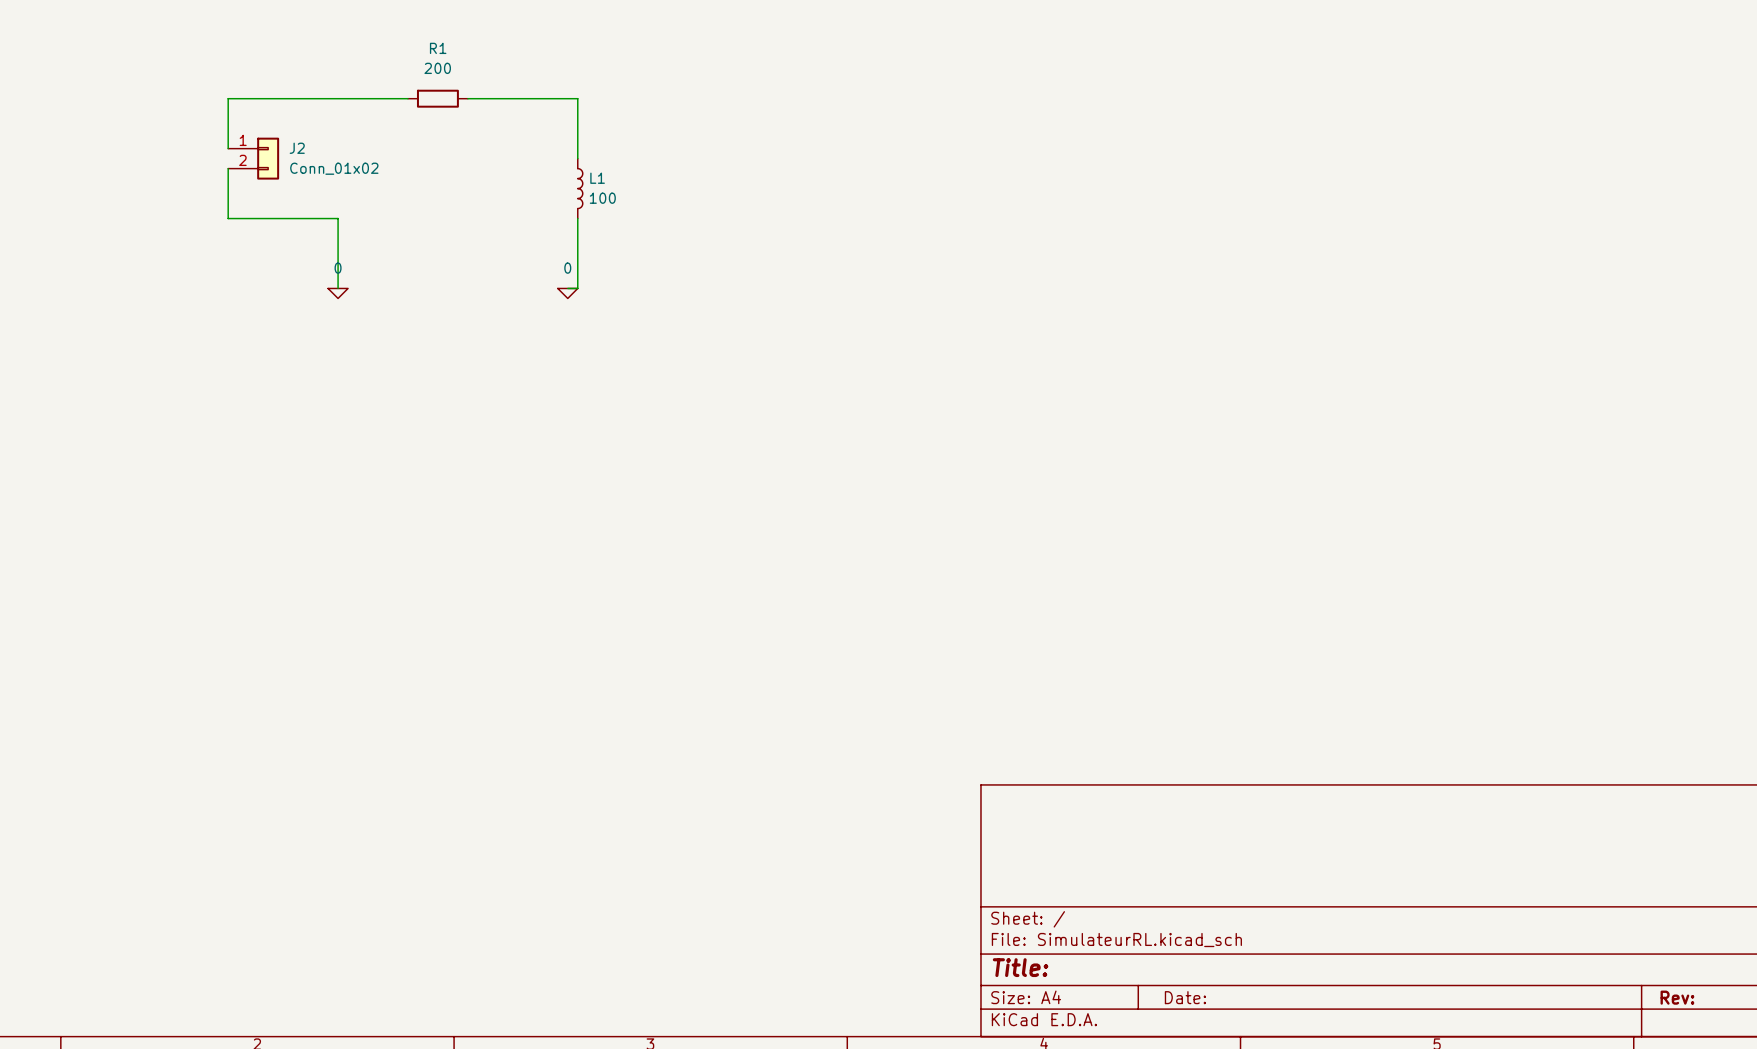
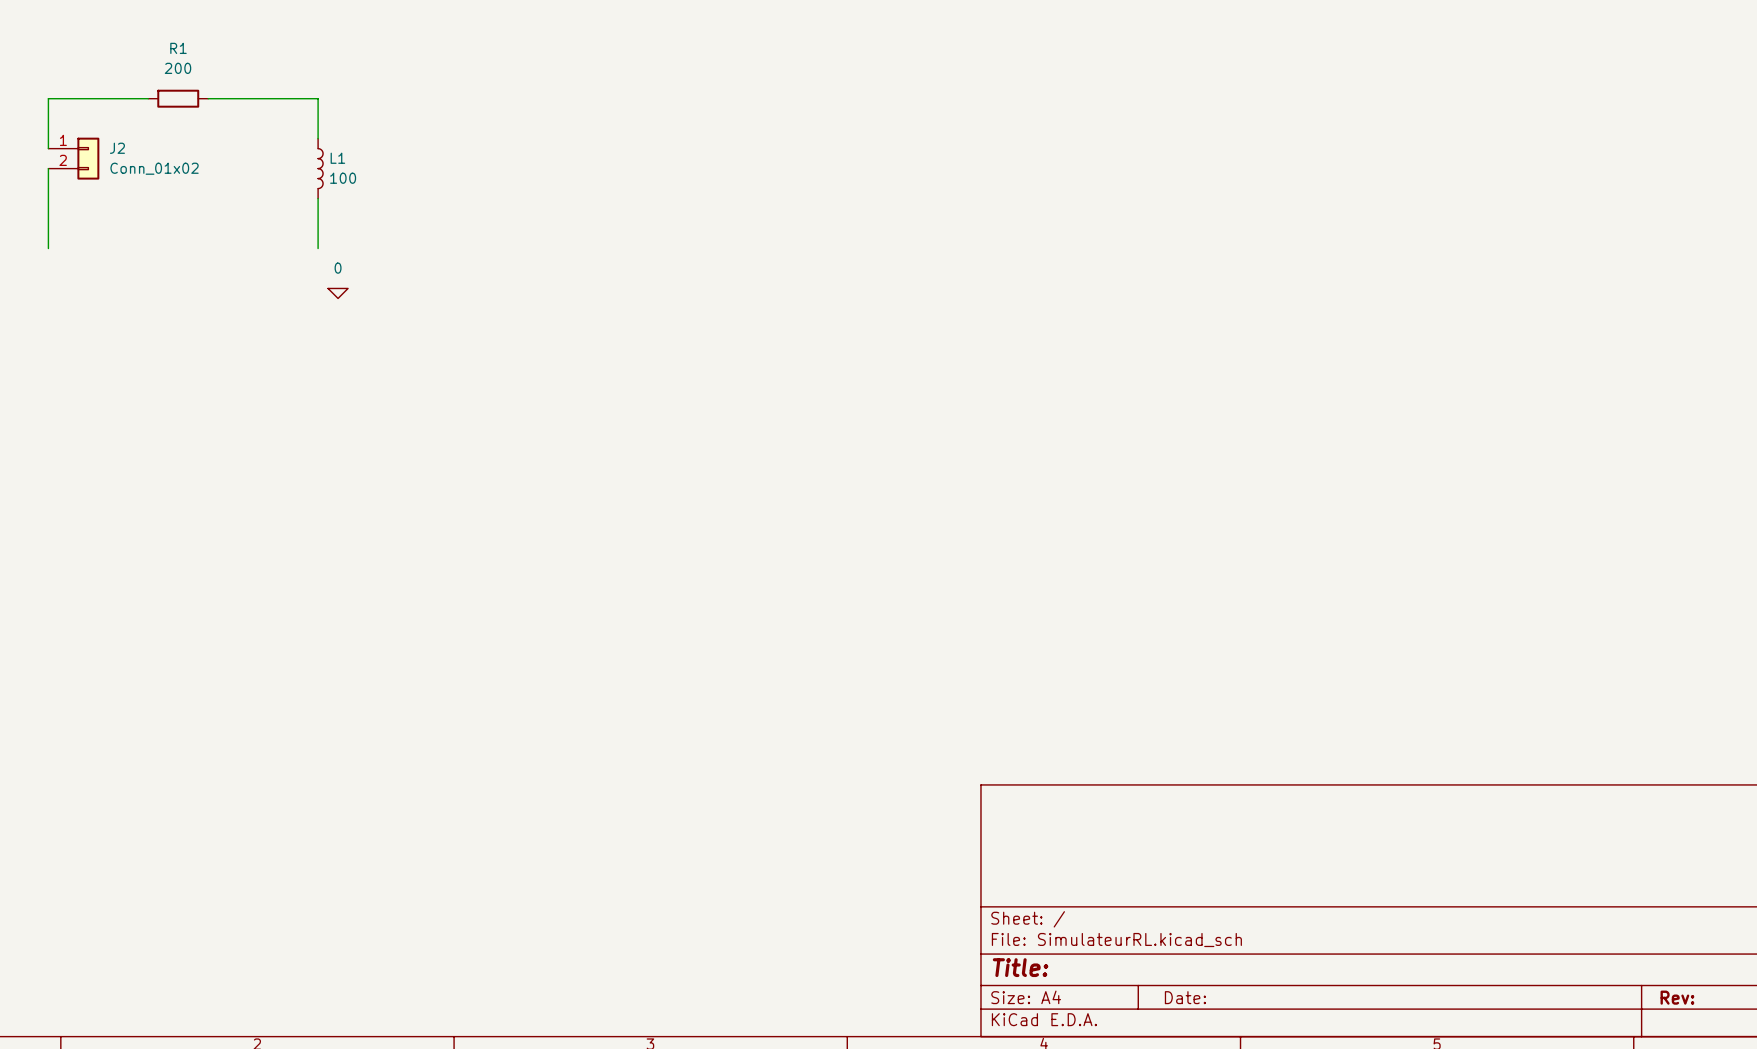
wire: none -> (148, 98) (48, 98) (48, 148)
wire: (228, 98) (228, 148) -> (228, 98) (208, 98)
wire: (318, 98) (407, 98) -> (318, 98) (318, 138)
R1 position: (437, 98) -> (178, 98)
wire: (467, 98) (577, 98) (577, 158) -> none
J2 position: (253, 158) -> (73, 158)
wire: none -> (48, 168) (48, 248)
wire: (228, 168) (228, 218) (338, 218) (338, 288) -> none
L1 position: (580, 188) -> (320, 168)
wire: none -> (318, 198) (318, 248)
wire: (577, 218) (577, 288) (567, 288) -> none
power symbol: 0 (567, 293) -> none

